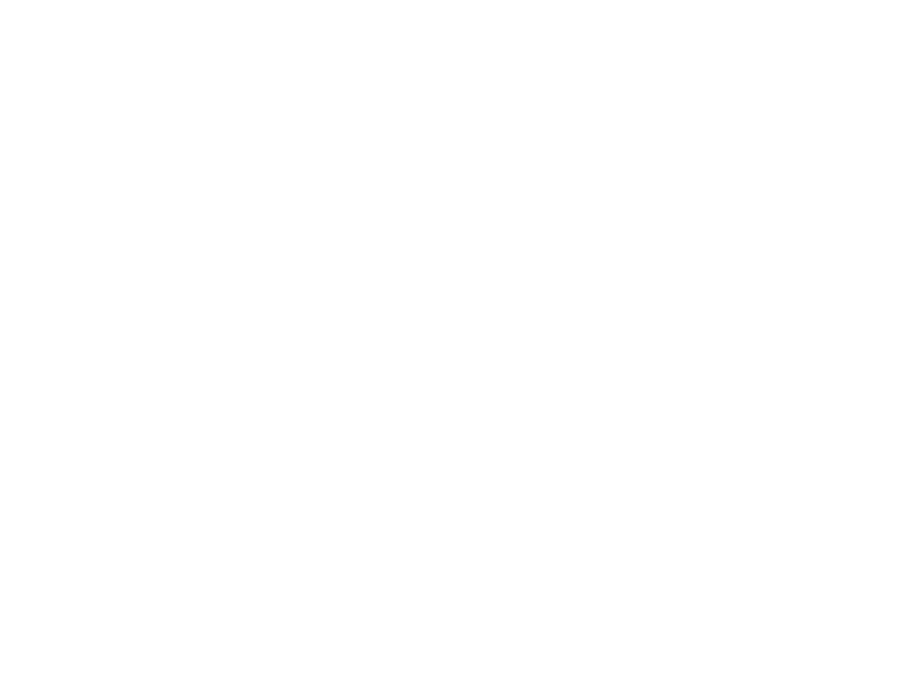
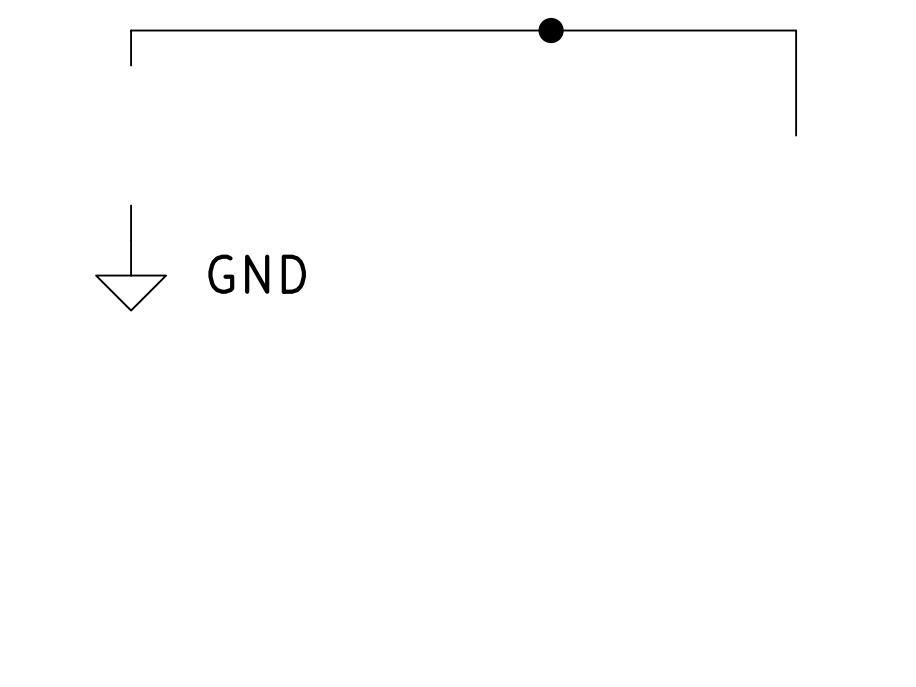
junction: none -> (551, 30)
wire: none -> (131, 65) (131, 30) (796, 30) (796, 135)
wire: none -> (131, 205) (131, 240)
power symbol: none -> GND (131, 275)

